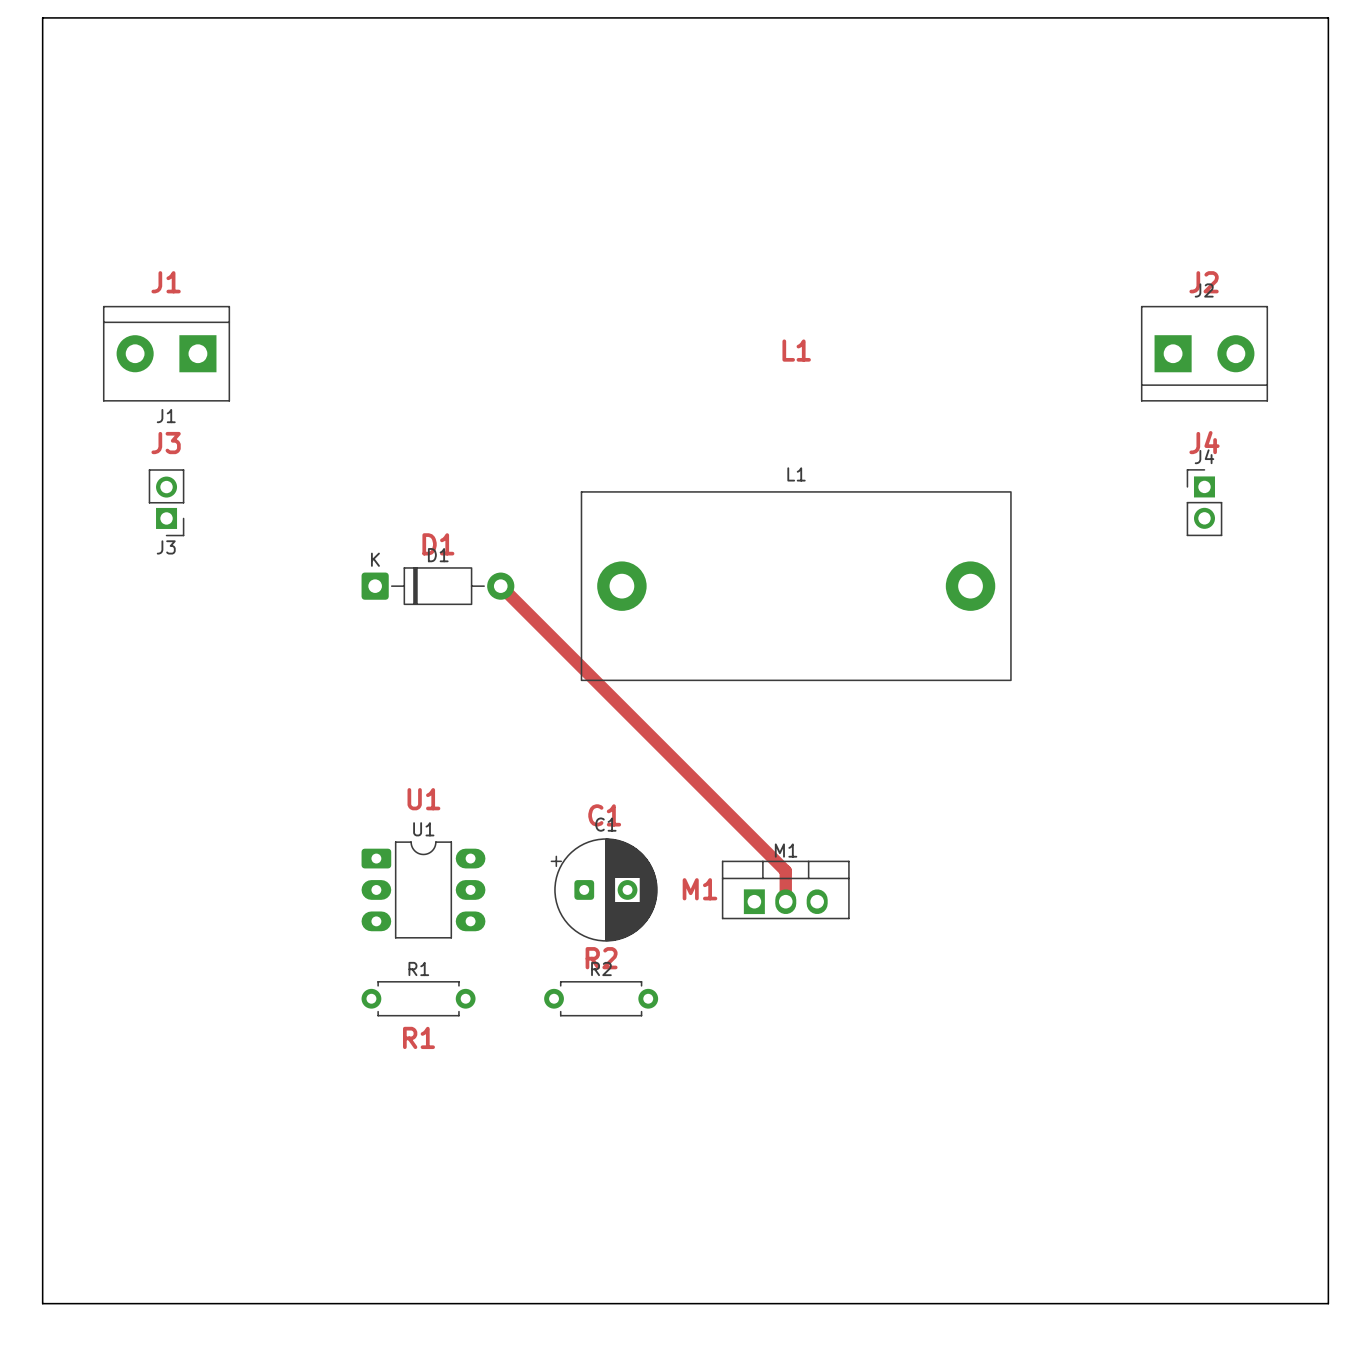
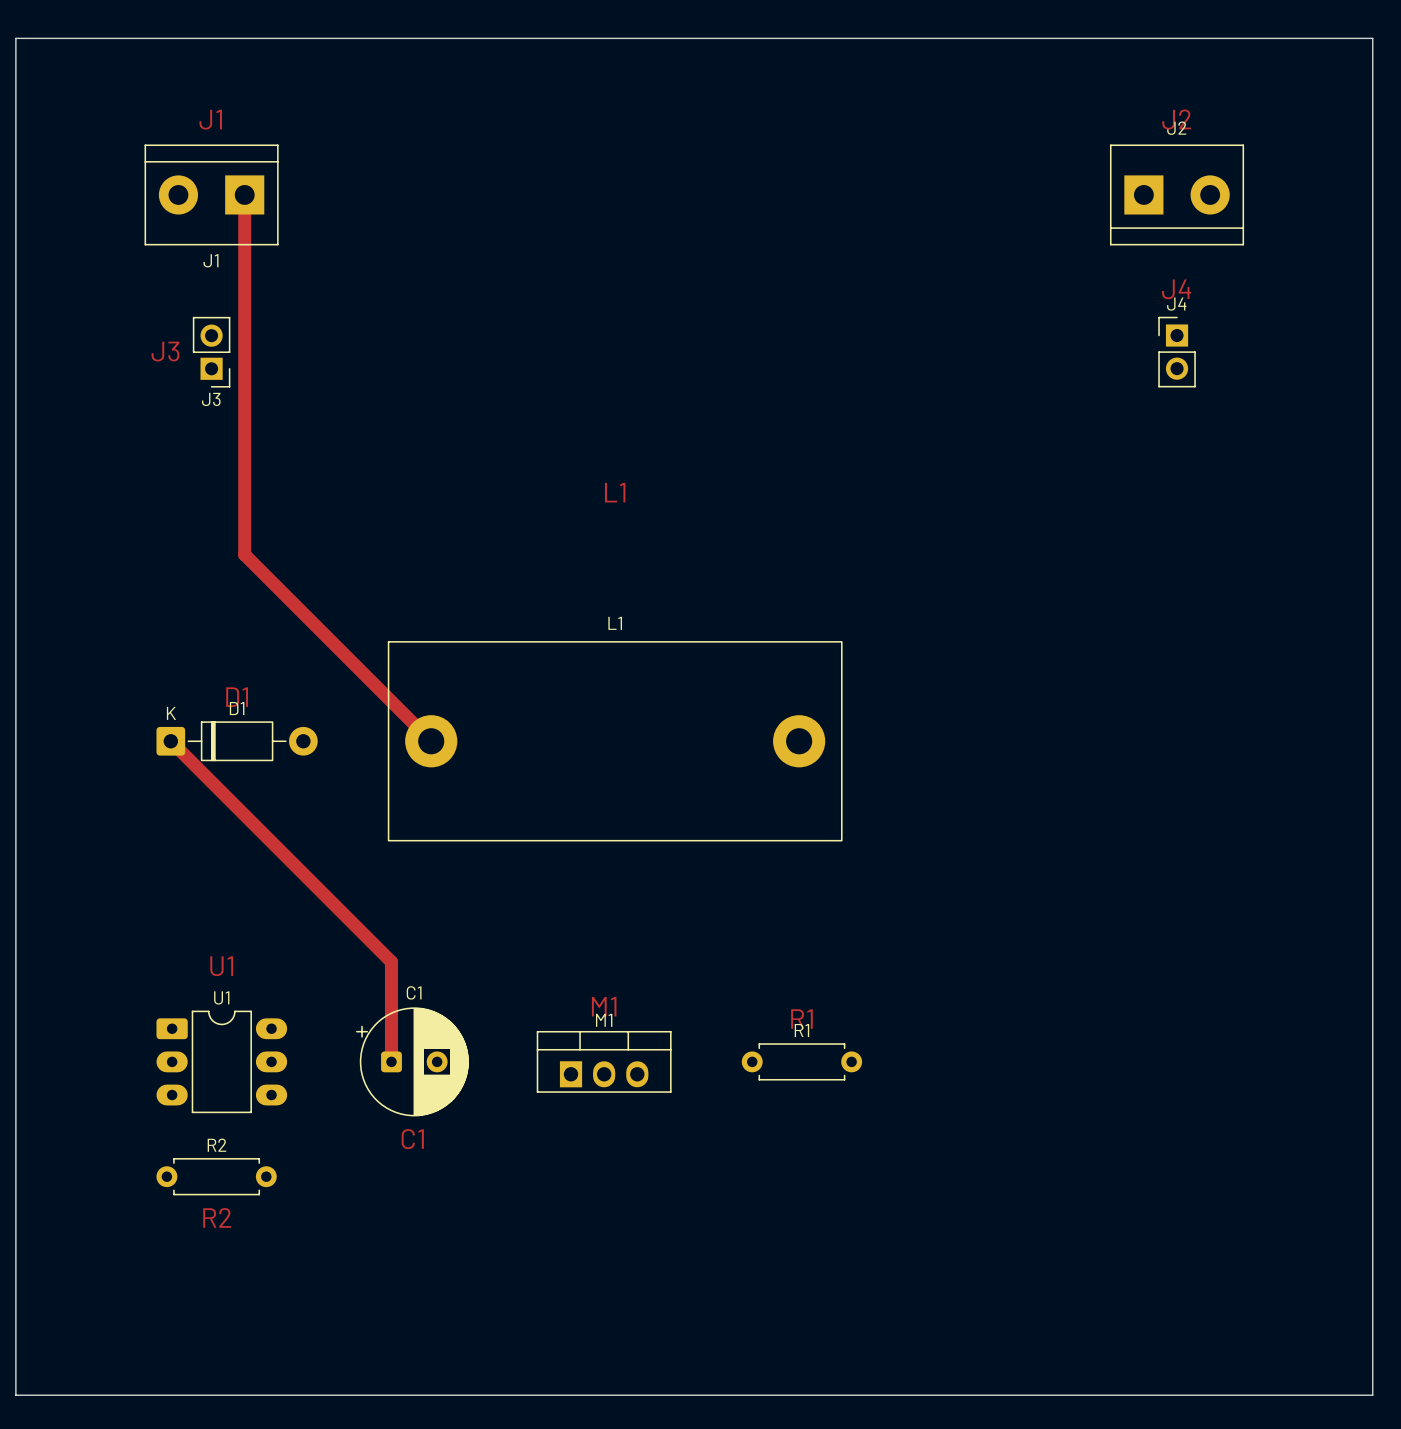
track: none -> (244, 194) (244, 554) (431, 741)
text position: J1 (166, 282) -> J1 (210, 119)
text position: J2 (1204, 282) -> J2 (1176, 119)
text position: L1 (796, 350) -> L1 (615, 492)
J1 position: (166, 353) -> (211, 194)
J2 position: (1204, 353) -> (1177, 194)
text position: J4 (1204, 442) -> J4 (1176, 289)
text position: J3 (166, 443) -> J3 (165, 351)
J3 position: (166, 502) -> (211, 352)
J4 position: (1204, 502) -> (1177, 352)
text position: D1 (438, 544) -> D1 (237, 697)
D1 position: (437, 586) -> (237, 741)
track: (500, 586) (785, 871) (785, 901) -> none
L1 position: (796, 586) -> (615, 741)
track: none -> (170, 741) (391, 961) (391, 1061)
text position: U1 (423, 799) -> U1 (221, 966)
text position: C1 (604, 815) -> C1 (412, 1139)
U1 position: (423, 889) -> (221, 1061)
C1 position: (604, 889) -> (412, 1061)
text position: M1 (699, 889) -> M1 (604, 1006)
M1 position: (785, 889) -> (604, 1061)
text: none -> R1 (801, 1019)
text: R2 (601, 958) -> none
R1 position: (418, 998) -> (801, 1061)
R2 position: (601, 998) -> (216, 1176)
text: R1 (418, 1037) -> none
text: none -> R2 (217, 1217)

